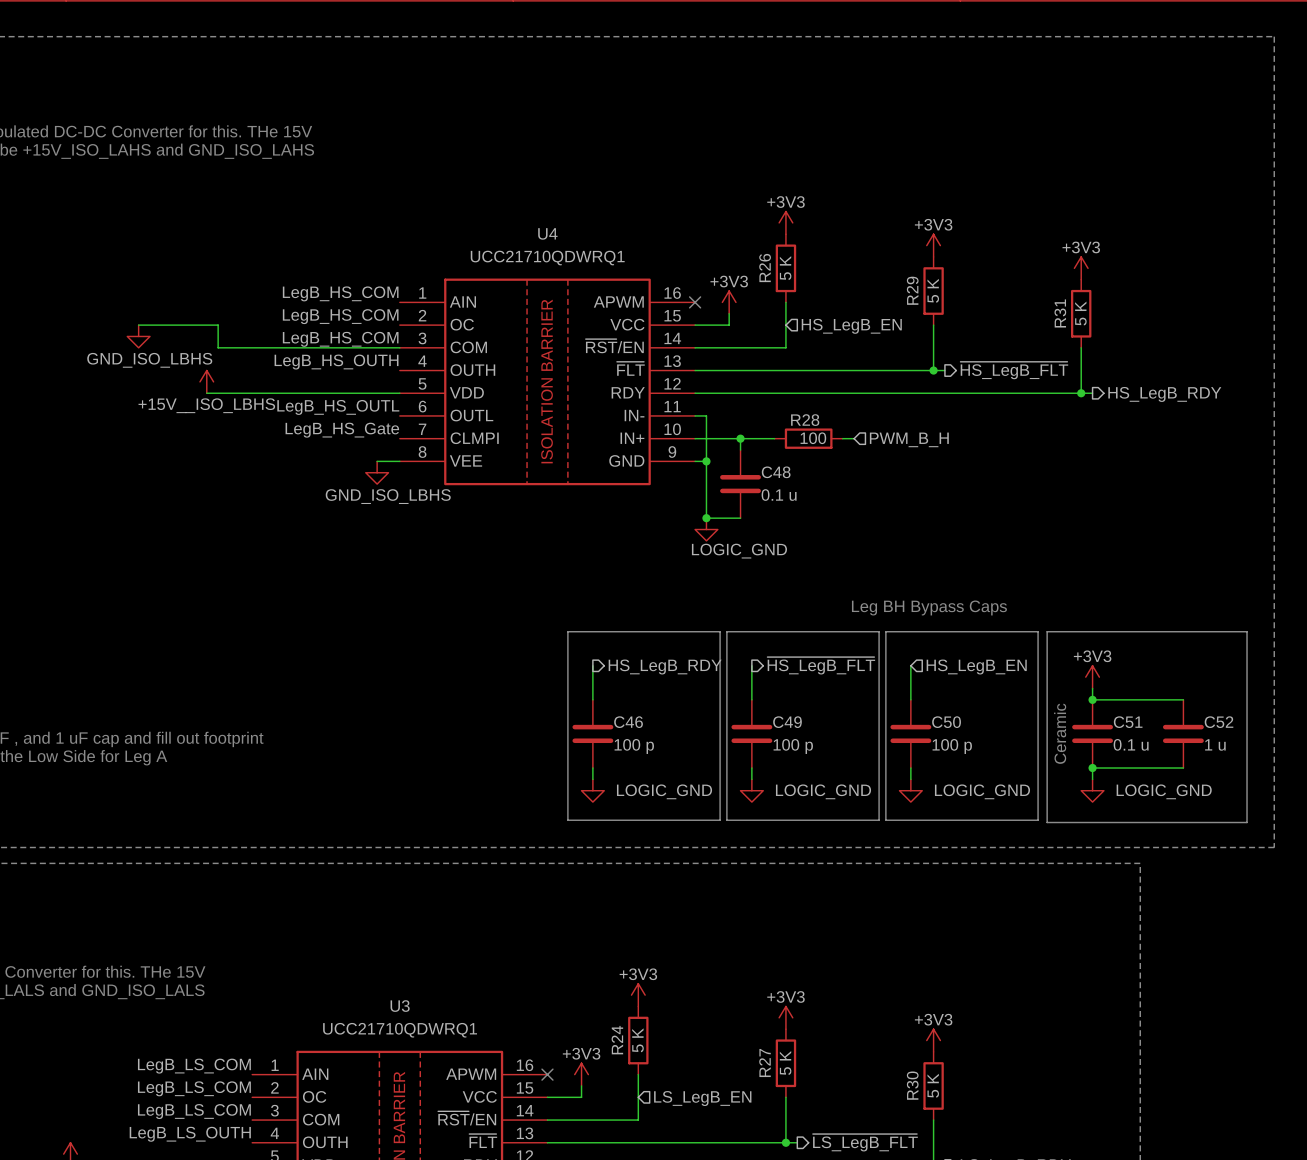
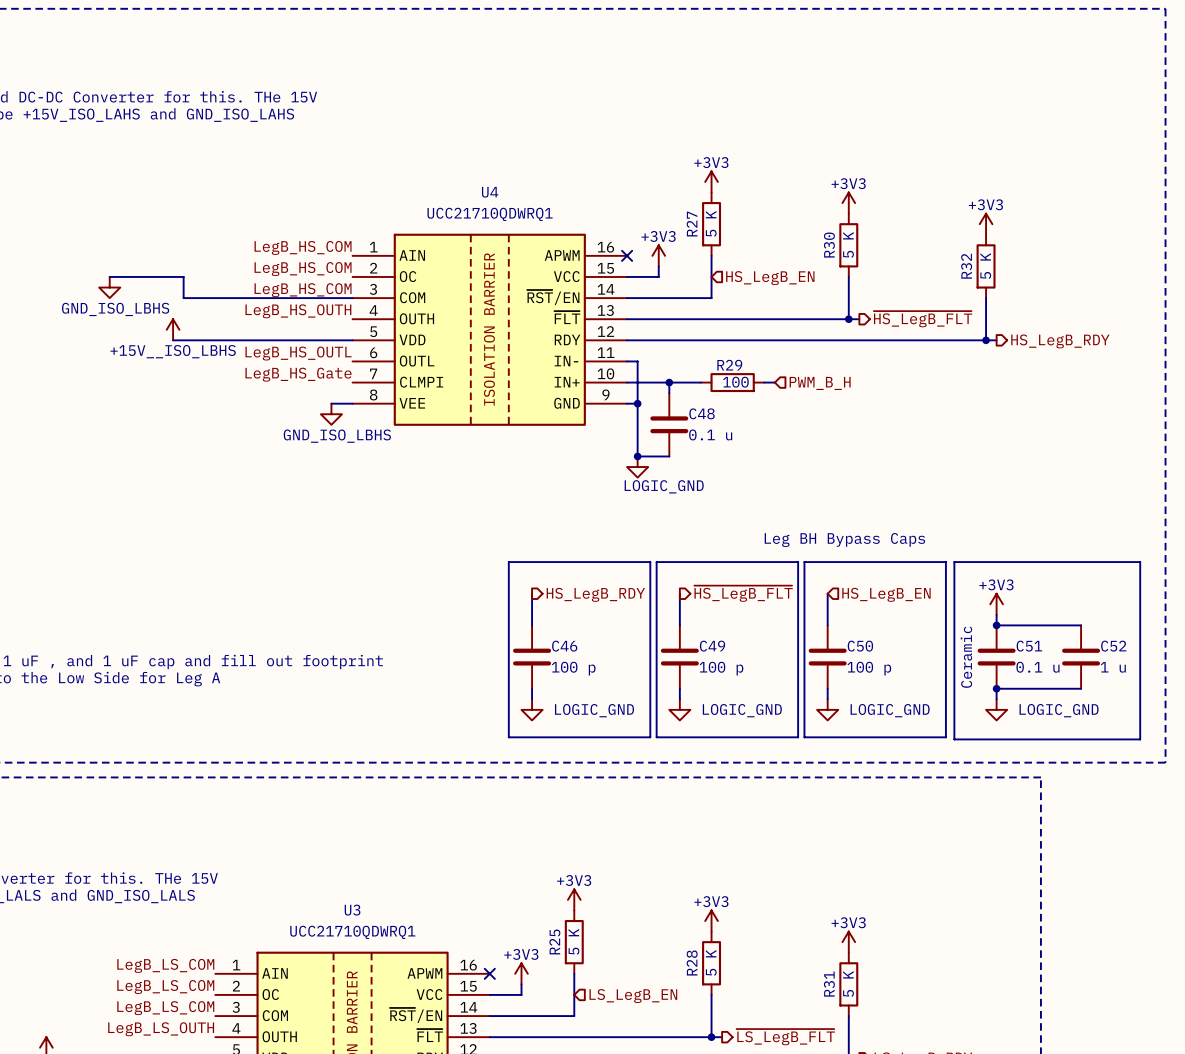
R26 name: R26 (765, 268) -> R27 (692, 224)
R29 name: R29 (912, 290) -> R30 (829, 245)
R31 name: R31 (1060, 313) -> R32 (966, 266)
R28 name: R28 (805, 420) -> R29 (729, 365)
R24 name: R24 (617, 1040) -> R25 (554, 941)
R27 name: R27 (765, 1063) -> R28 (692, 963)
R30 name: R30 (912, 1085) -> R31 (829, 984)

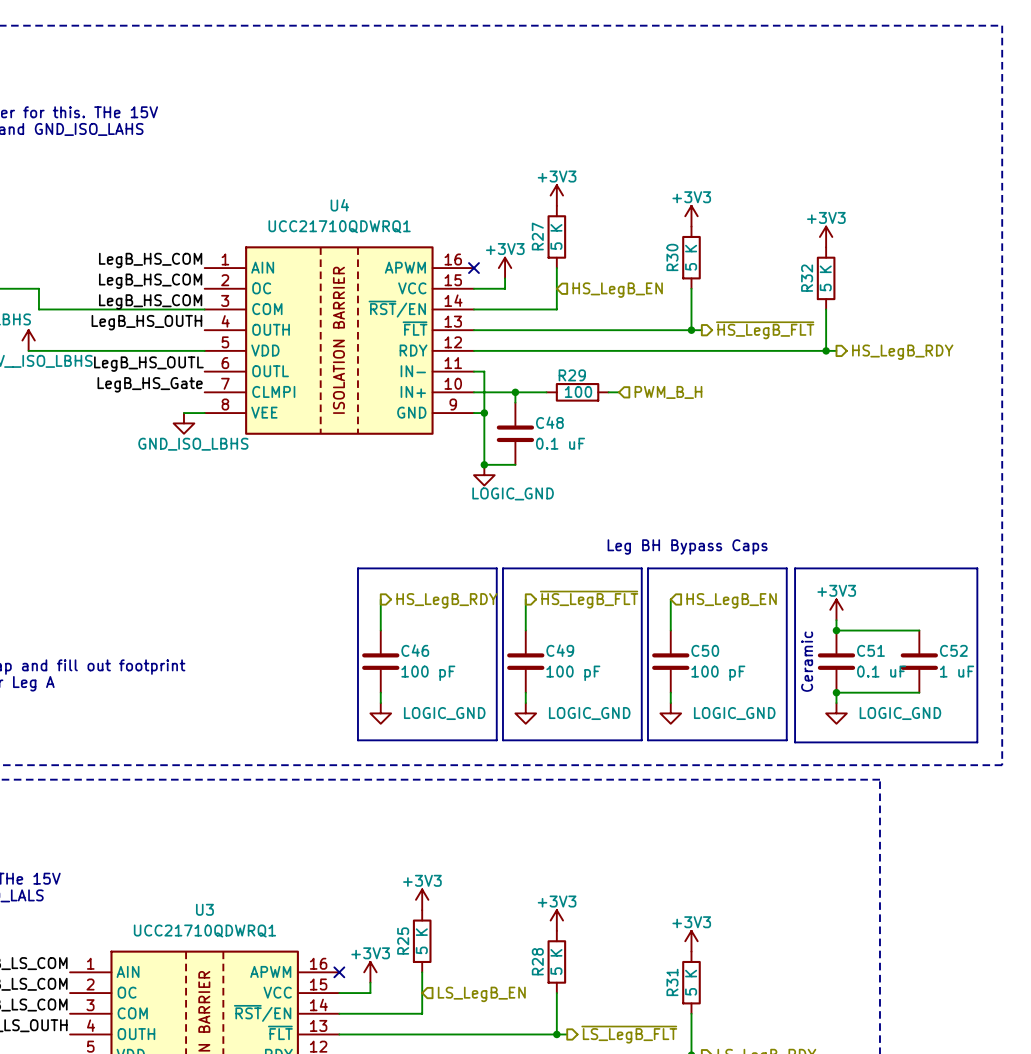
C48 value: 0.1 u (710, 434) -> 0.1 uF (560, 443)
C51 value: 0.1 u (1037, 667) -> 0.1 uF (881, 671)
C52 value: 1 u (1113, 667) -> 1 uF (957, 671)
C46 value: 100 p (573, 668) -> 100 pF (428, 673)
C49 value: 100 p (721, 668) -> 100 pF (573, 673)
C50 value: 100 p (869, 668) -> 100 pF (718, 673)

